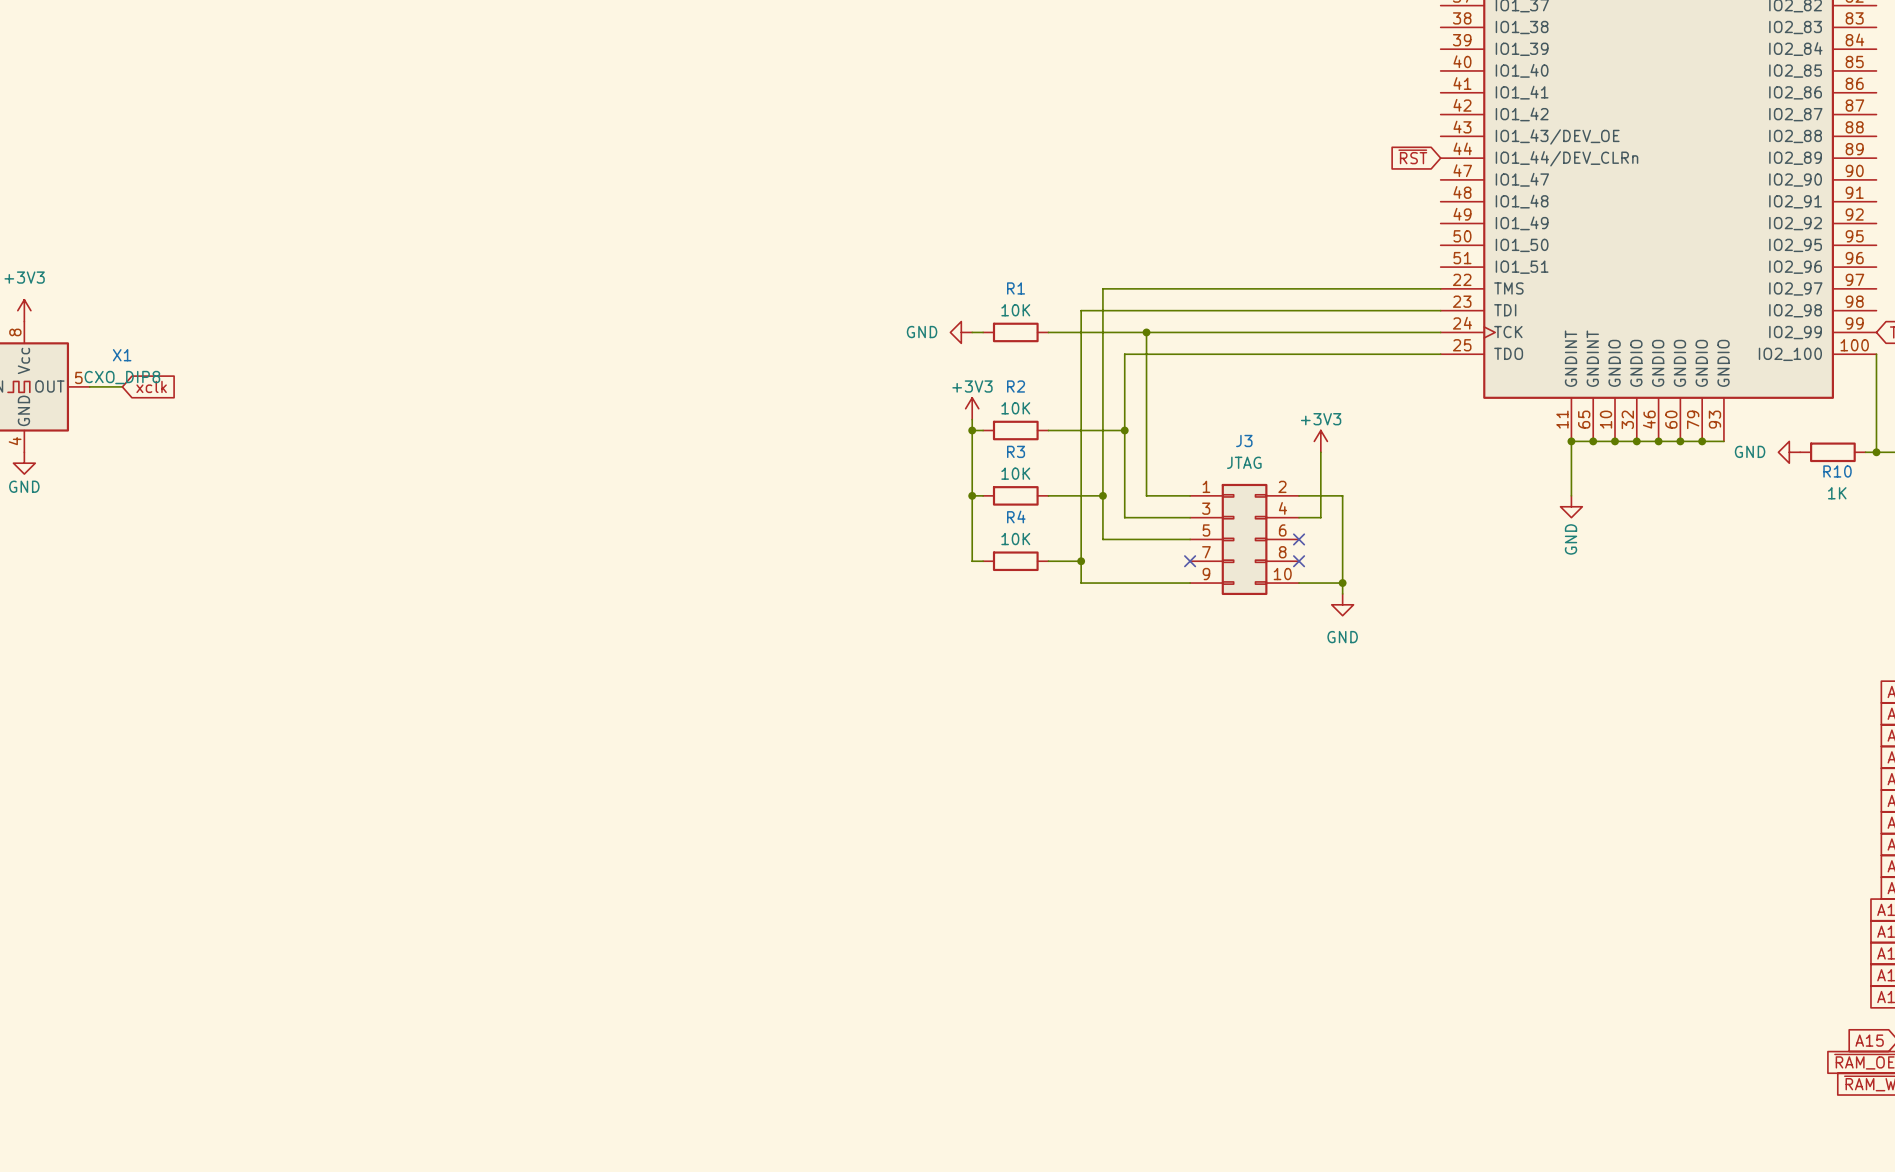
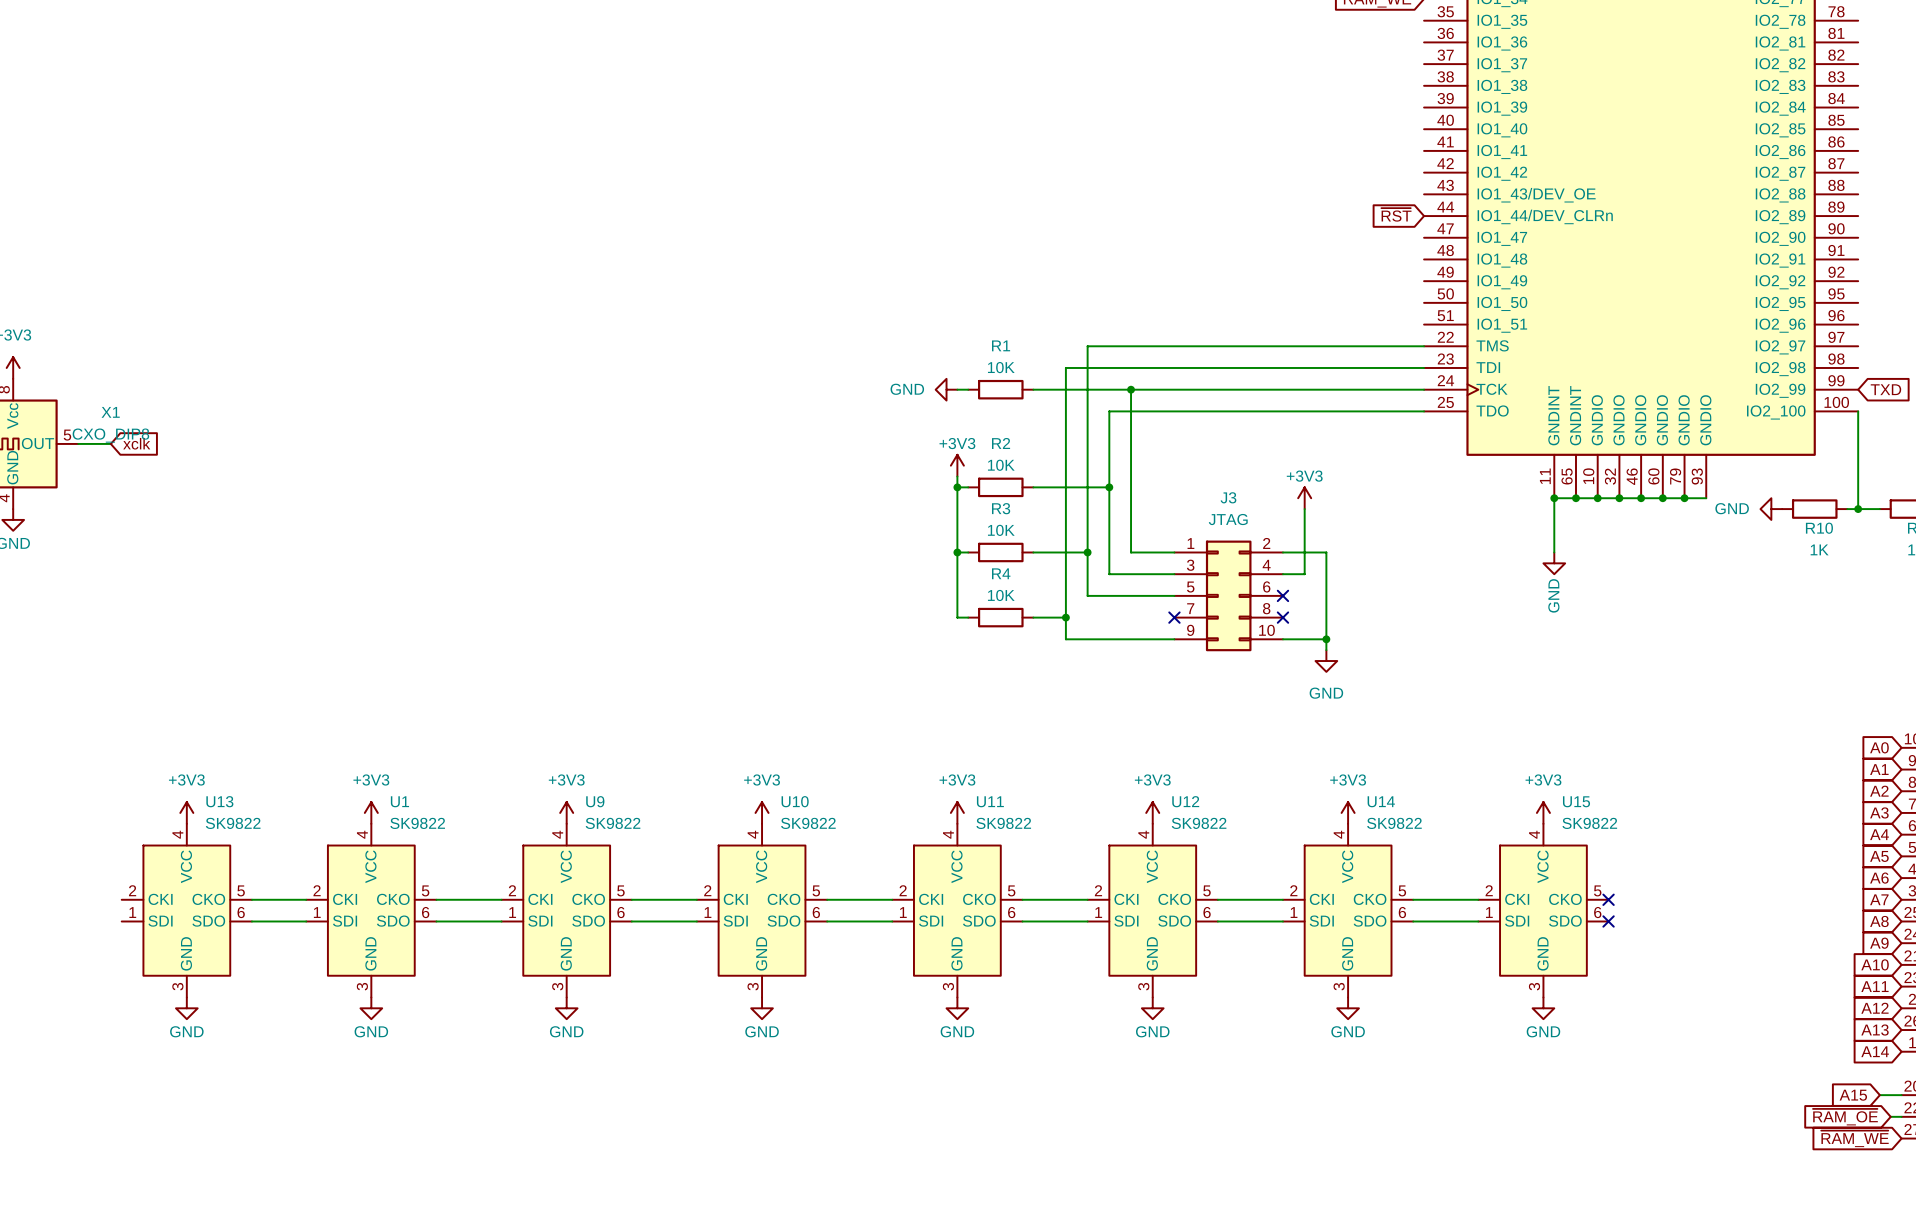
power symbol: none -> +3V3 (186, 812)
power symbol: none -> +3V3 (371, 812)
power symbol: none -> +3V3 (566, 812)
power symbol: none -> +3V3 (762, 812)
power symbol: none -> +3V3 (957, 812)
power symbol: none -> +3V3 (1152, 812)
power symbol: none -> +3V3 (1348, 812)
power symbol: none -> +3V3 (1543, 812)
wire: none -> (251, 899) (306, 899)
wire: none -> (436, 899) (501, 899)
wire: none -> (631, 899) (696, 899)
wire: none -> (827, 899) (892, 899)
wire: none -> (1022, 899) (1087, 899)
wire: none -> (1217, 899) (1282, 899)
wire: none -> (1413, 899) (1478, 899)
no-connect mark: none -> (1608, 899)
U13: none -> SK9822 (186, 910)
U1: none -> SK9822 (371, 910)
U9: none -> SK9822 (566, 910)
U10: none -> SK9822 (762, 910)
U11: none -> SK9822 (957, 910)
U12: none -> SK9822 (1152, 910)
U14: none -> SK9822 (1348, 910)
U15: none -> SK9822 (1543, 910)
wire: none -> (251, 921) (306, 921)
wire: none -> (436, 921) (501, 921)
wire: none -> (631, 921) (696, 921)
wire: none -> (827, 921) (892, 921)
wire: none -> (1022, 921) (1087, 921)
wire: none -> (1217, 921) (1282, 921)
wire: none -> (1413, 921) (1478, 921)
no-connect mark: none -> (1608, 921)
power symbol: none -> GND (186, 1008)
power symbol: none -> GND (371, 1008)
power symbol: none -> GND (566, 1008)
power symbol: none -> GND (762, 1008)
power symbol: none -> GND (957, 1008)
power symbol: none -> GND (1152, 1008)
power symbol: none -> GND (1348, 1008)
power symbol: none -> GND (1543, 1008)

